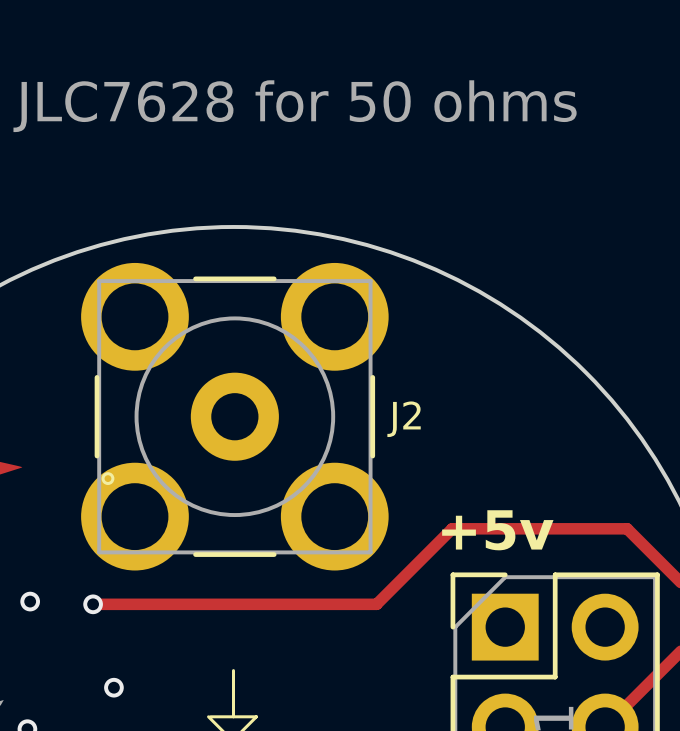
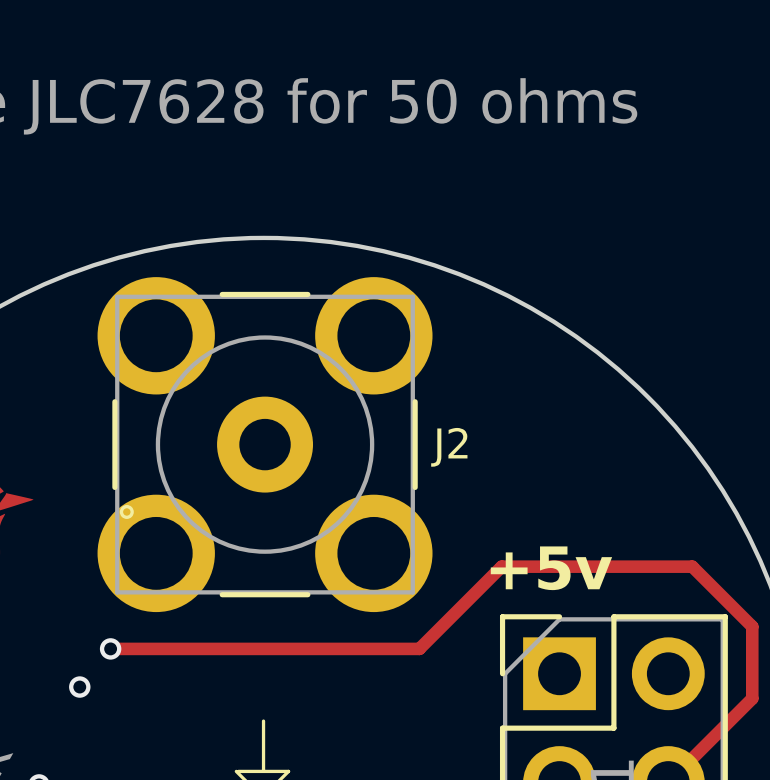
via: (30, 601) -> none
via: none -> (79, 687)
via: (113, 687) -> none

